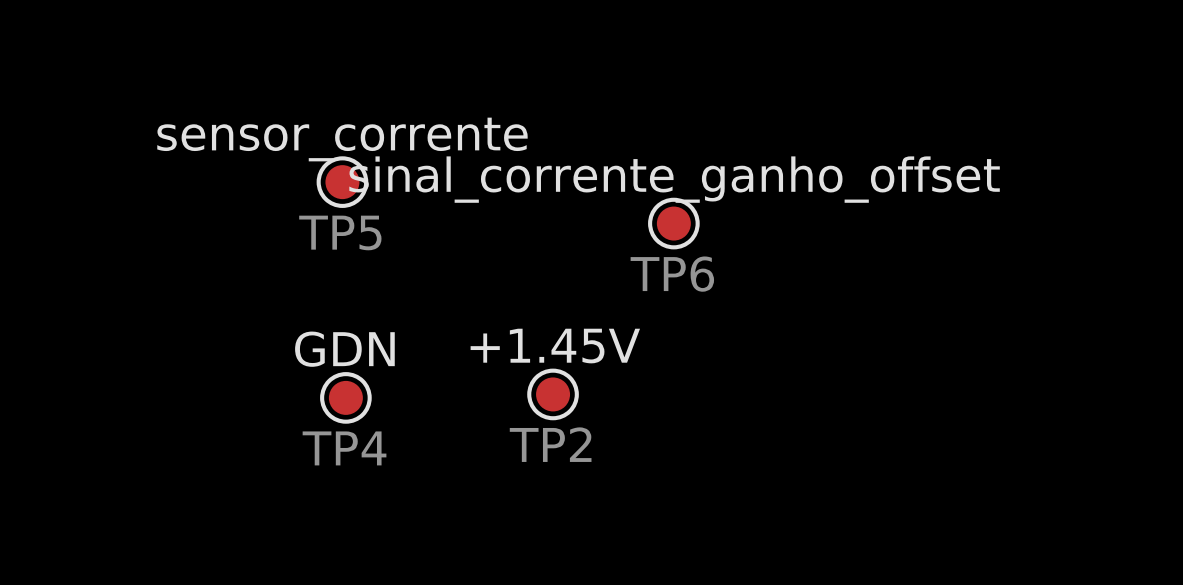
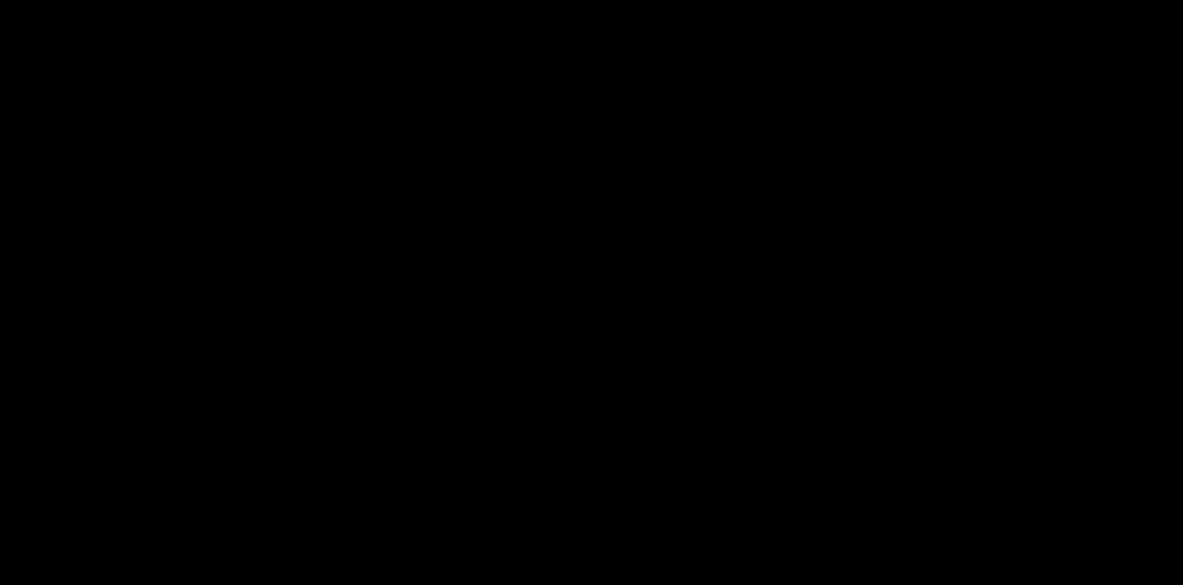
TP5: sensor_corrente (342, 182) -> none
TP6: sinal_corrente_ganho_offset (673, 223) -> none
TP2: +1.45V (553, 394) -> none
TP4: GDN (345, 397) -> none

